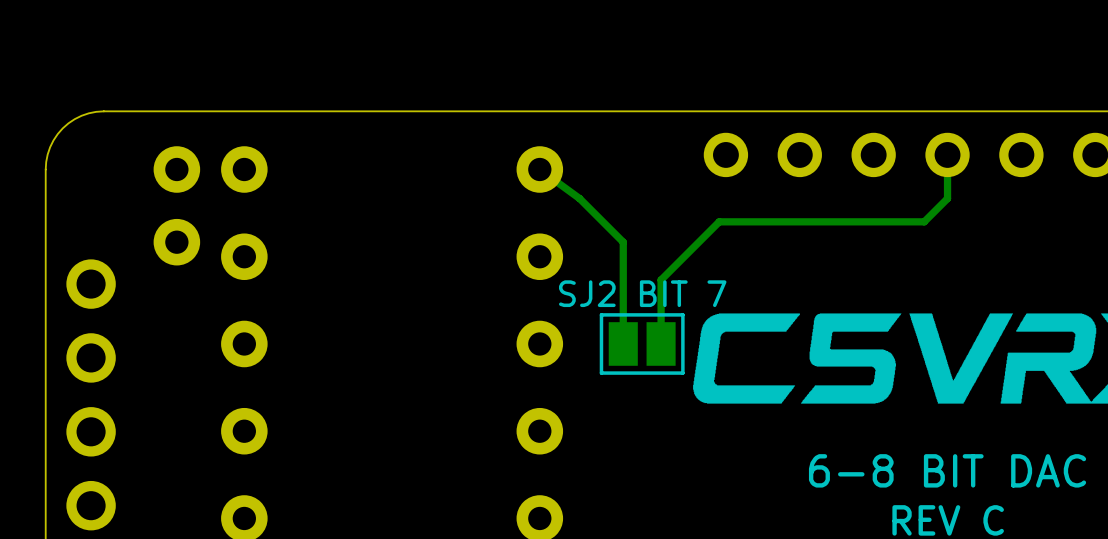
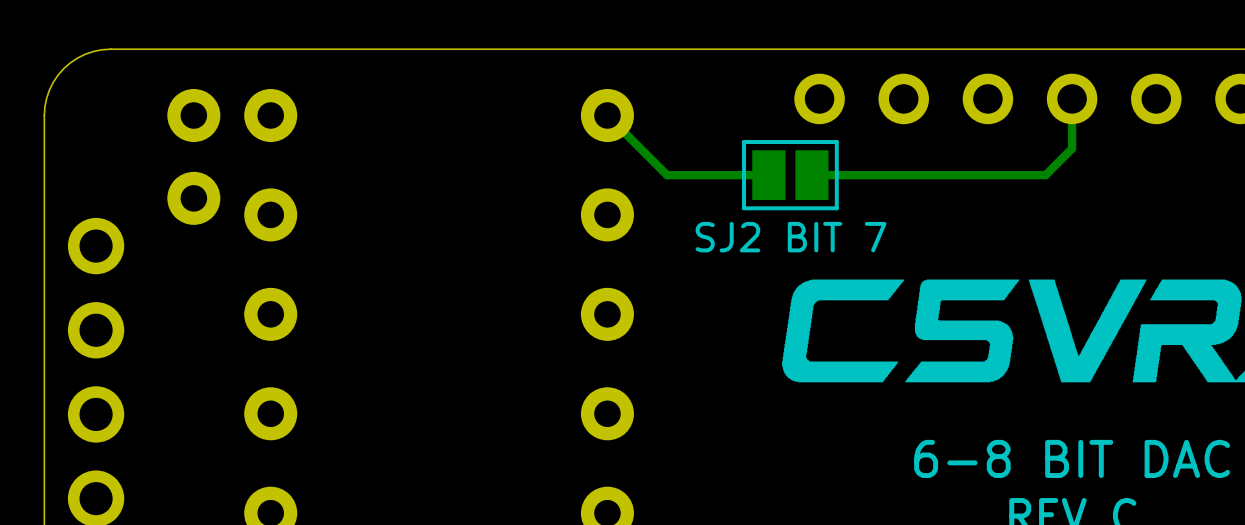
track: (539, 169) (579, 198) (623, 242) (623, 343) -> (607, 115) (667, 175) (768, 175)
track: (719, 221) (661, 280) (661, 343) -> none
text position: SJ2 BIT 7 (642, 293) -> SJ2 BIT 7 (791, 237)
part position: (642, 343) -> (790, 175)

